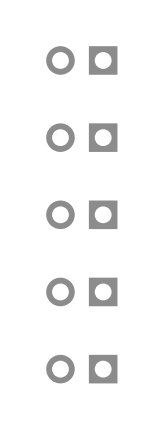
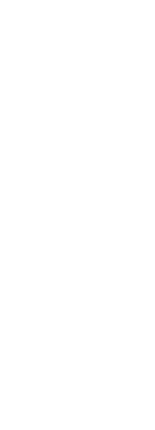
part: (81, 60) -> none
part: (81, 137) -> none
part: (81, 214) -> none
part: (81, 291) -> none
part: (81, 369) -> none

